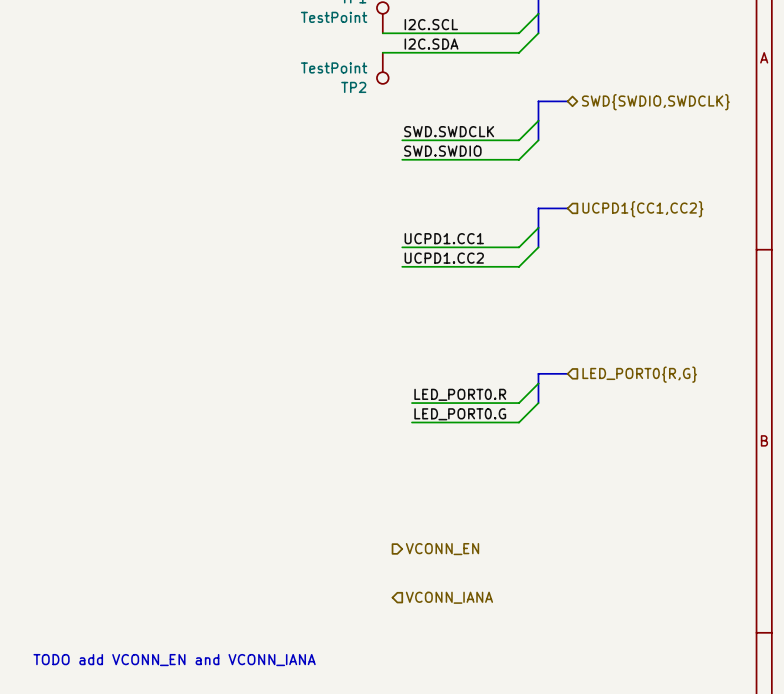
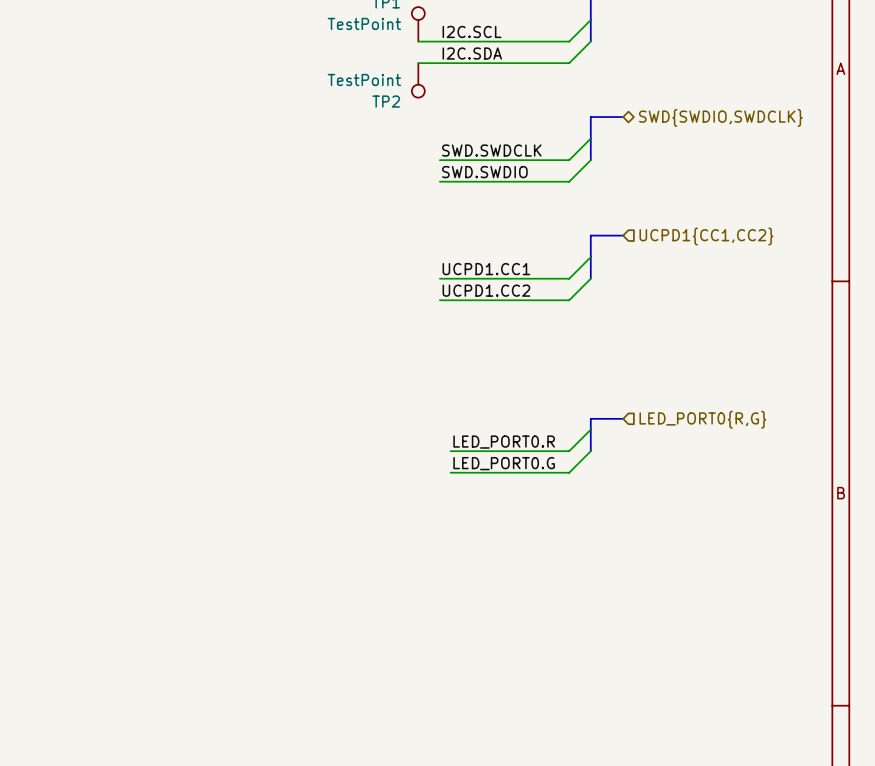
hierarchical label: VCONN_EN (442, 549) -> none
hierarchical label: VCONN_IANA (449, 597) -> none
text: TODO add VCONN_EN and VCONN_IANA (174, 660) -> none

